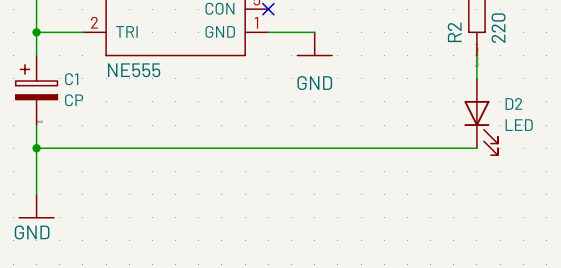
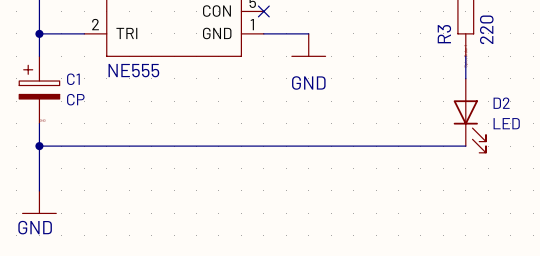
R2 name: R2 (454, 32) -> R3 (444, 34)

